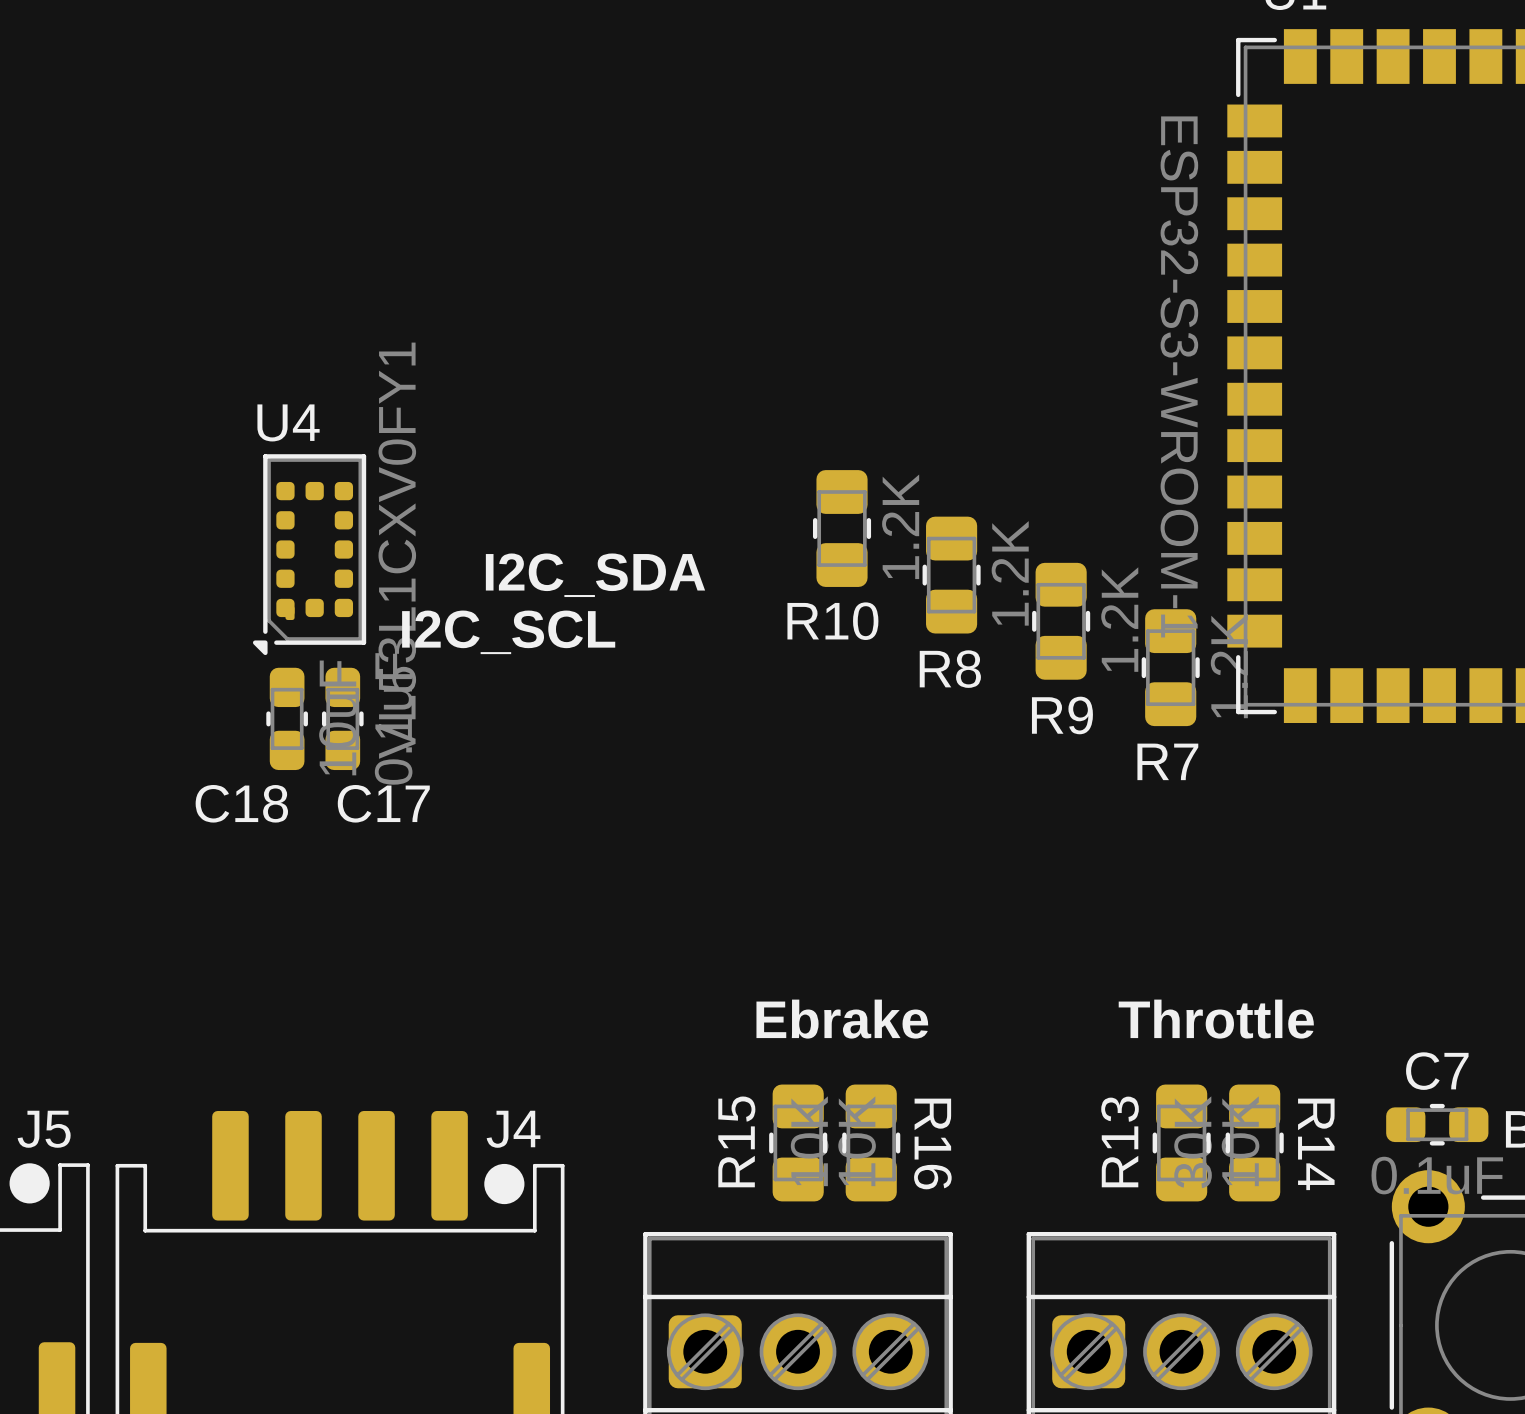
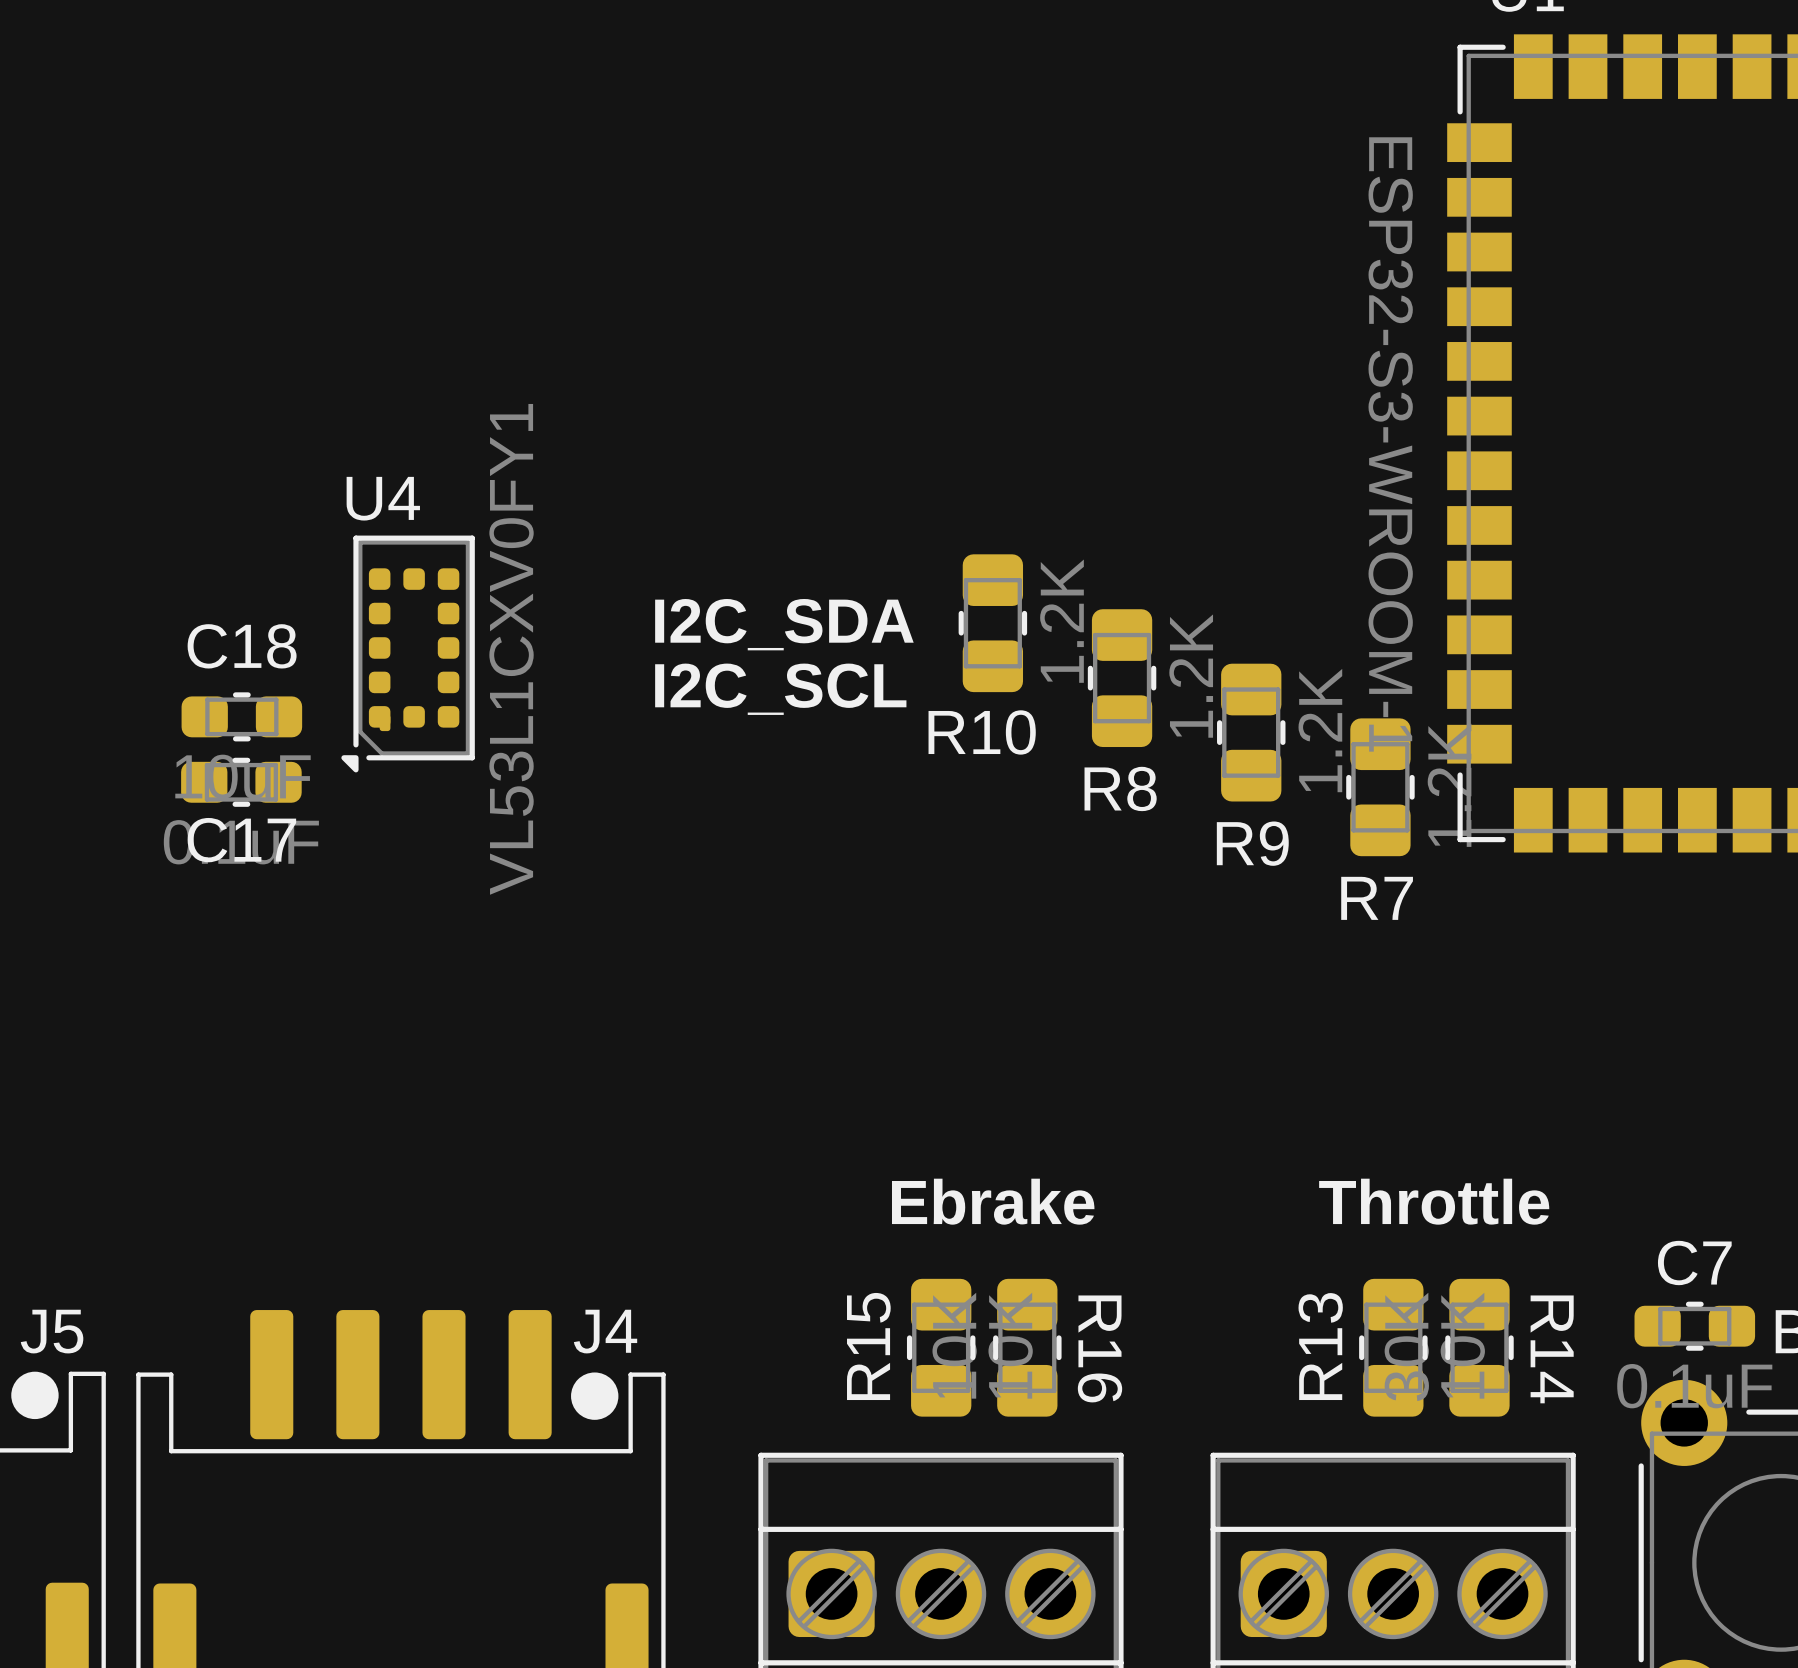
U4 position: (309, 554) -> (408, 654)
text position: I2C_SDA (595, 575) -> I2C_SDA (784, 624)
text position: I2C_SCL (508, 632) -> I2C_SCL (780, 689)
C18 rotation: 0° (287, 718) -> 90° clockwise (241, 716)
C18 position: (287, 718) -> (241, 716)
C17 rotation: 0° (342, 718) -> 90° clockwise (241, 782)
C17 position: (342, 718) -> (241, 782)
C18 name position: C18 (241, 803) -> C18 (242, 646)

